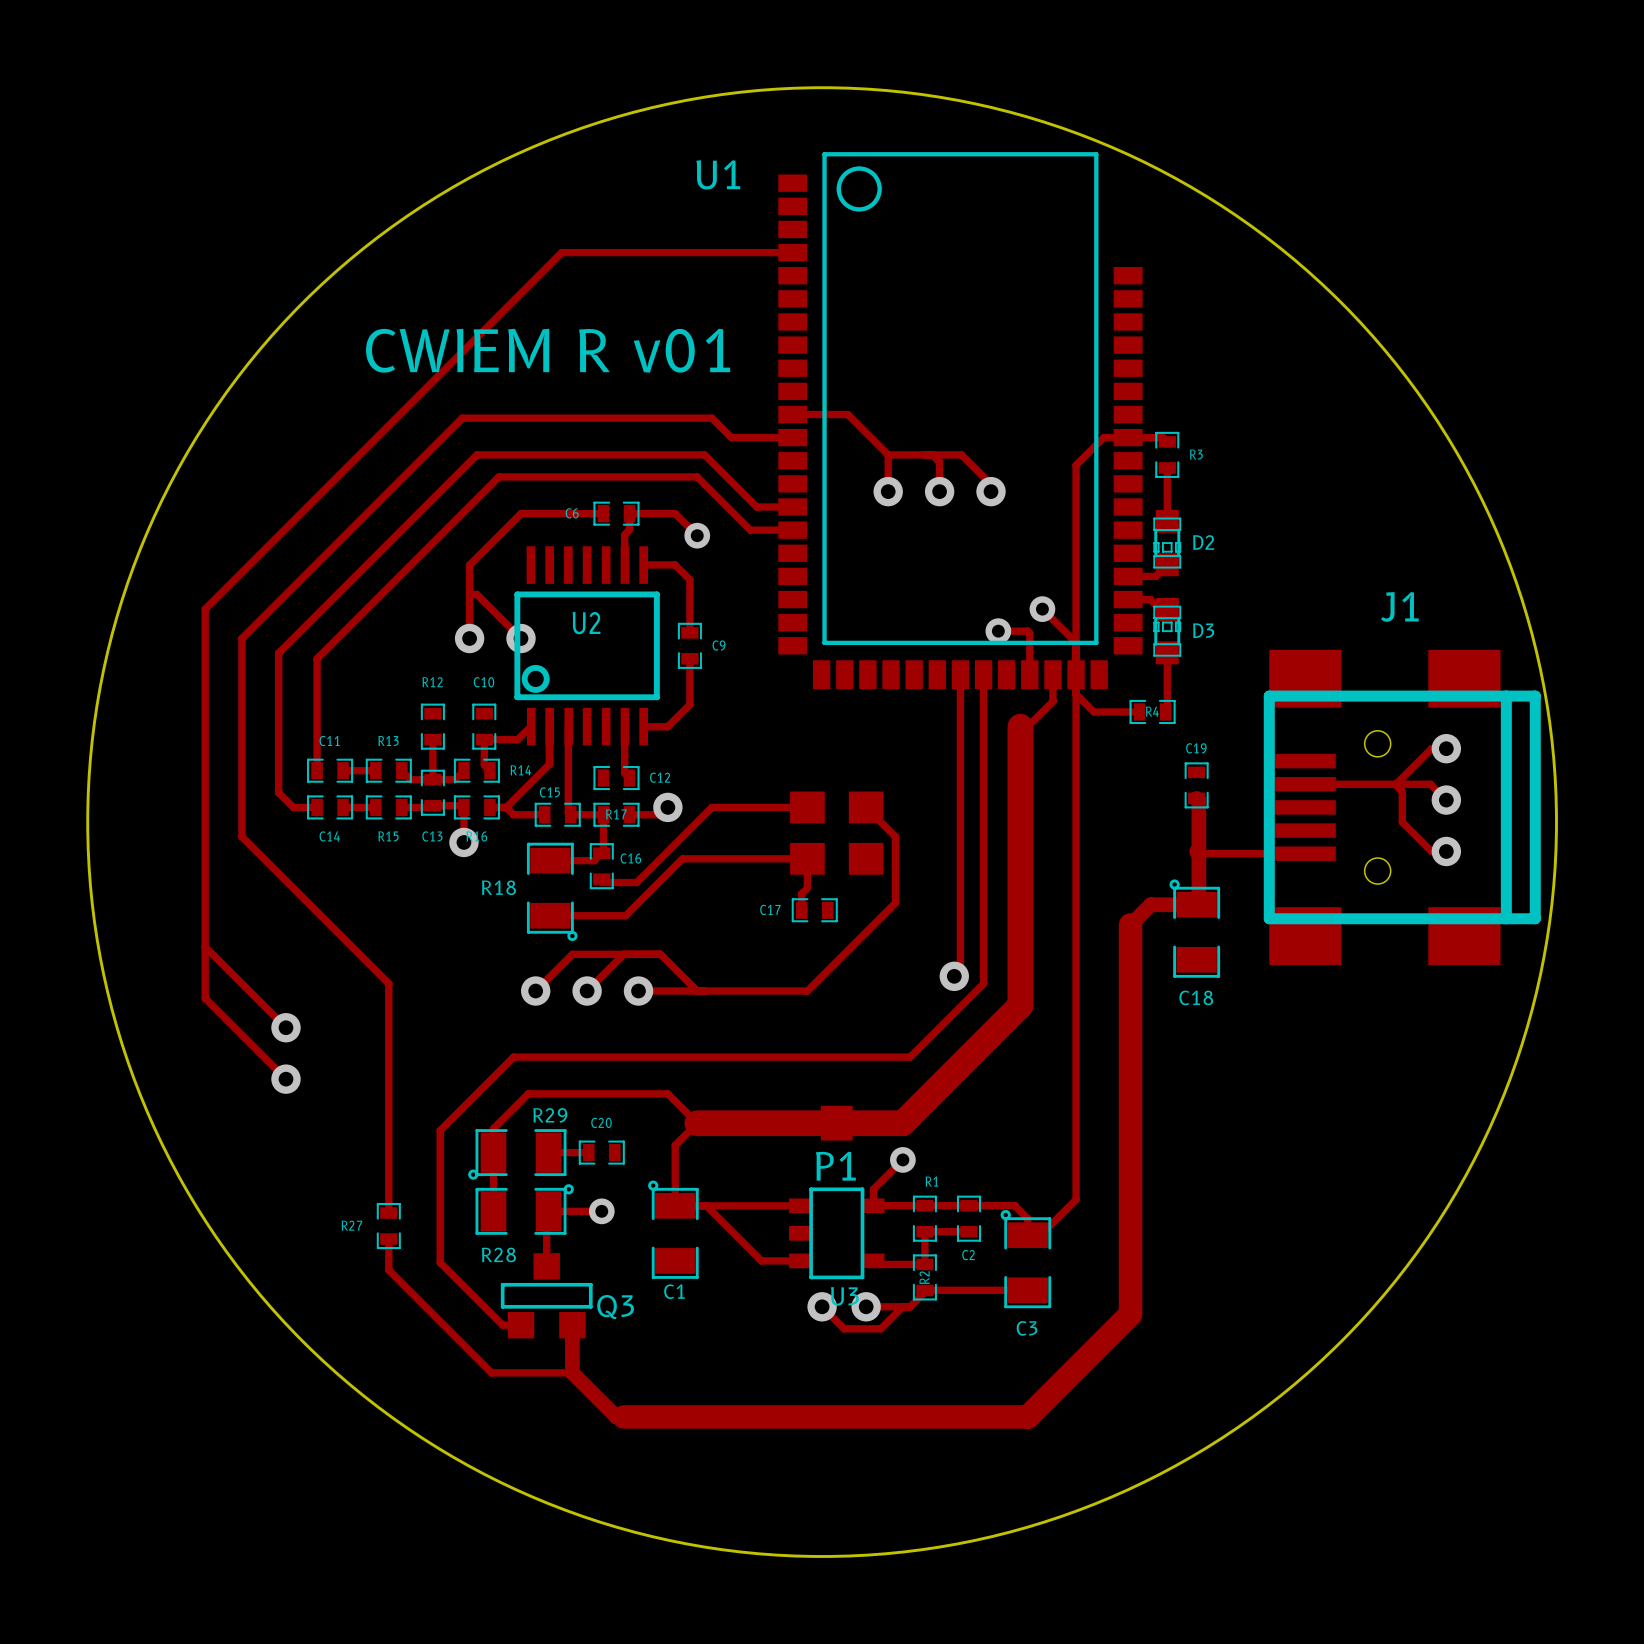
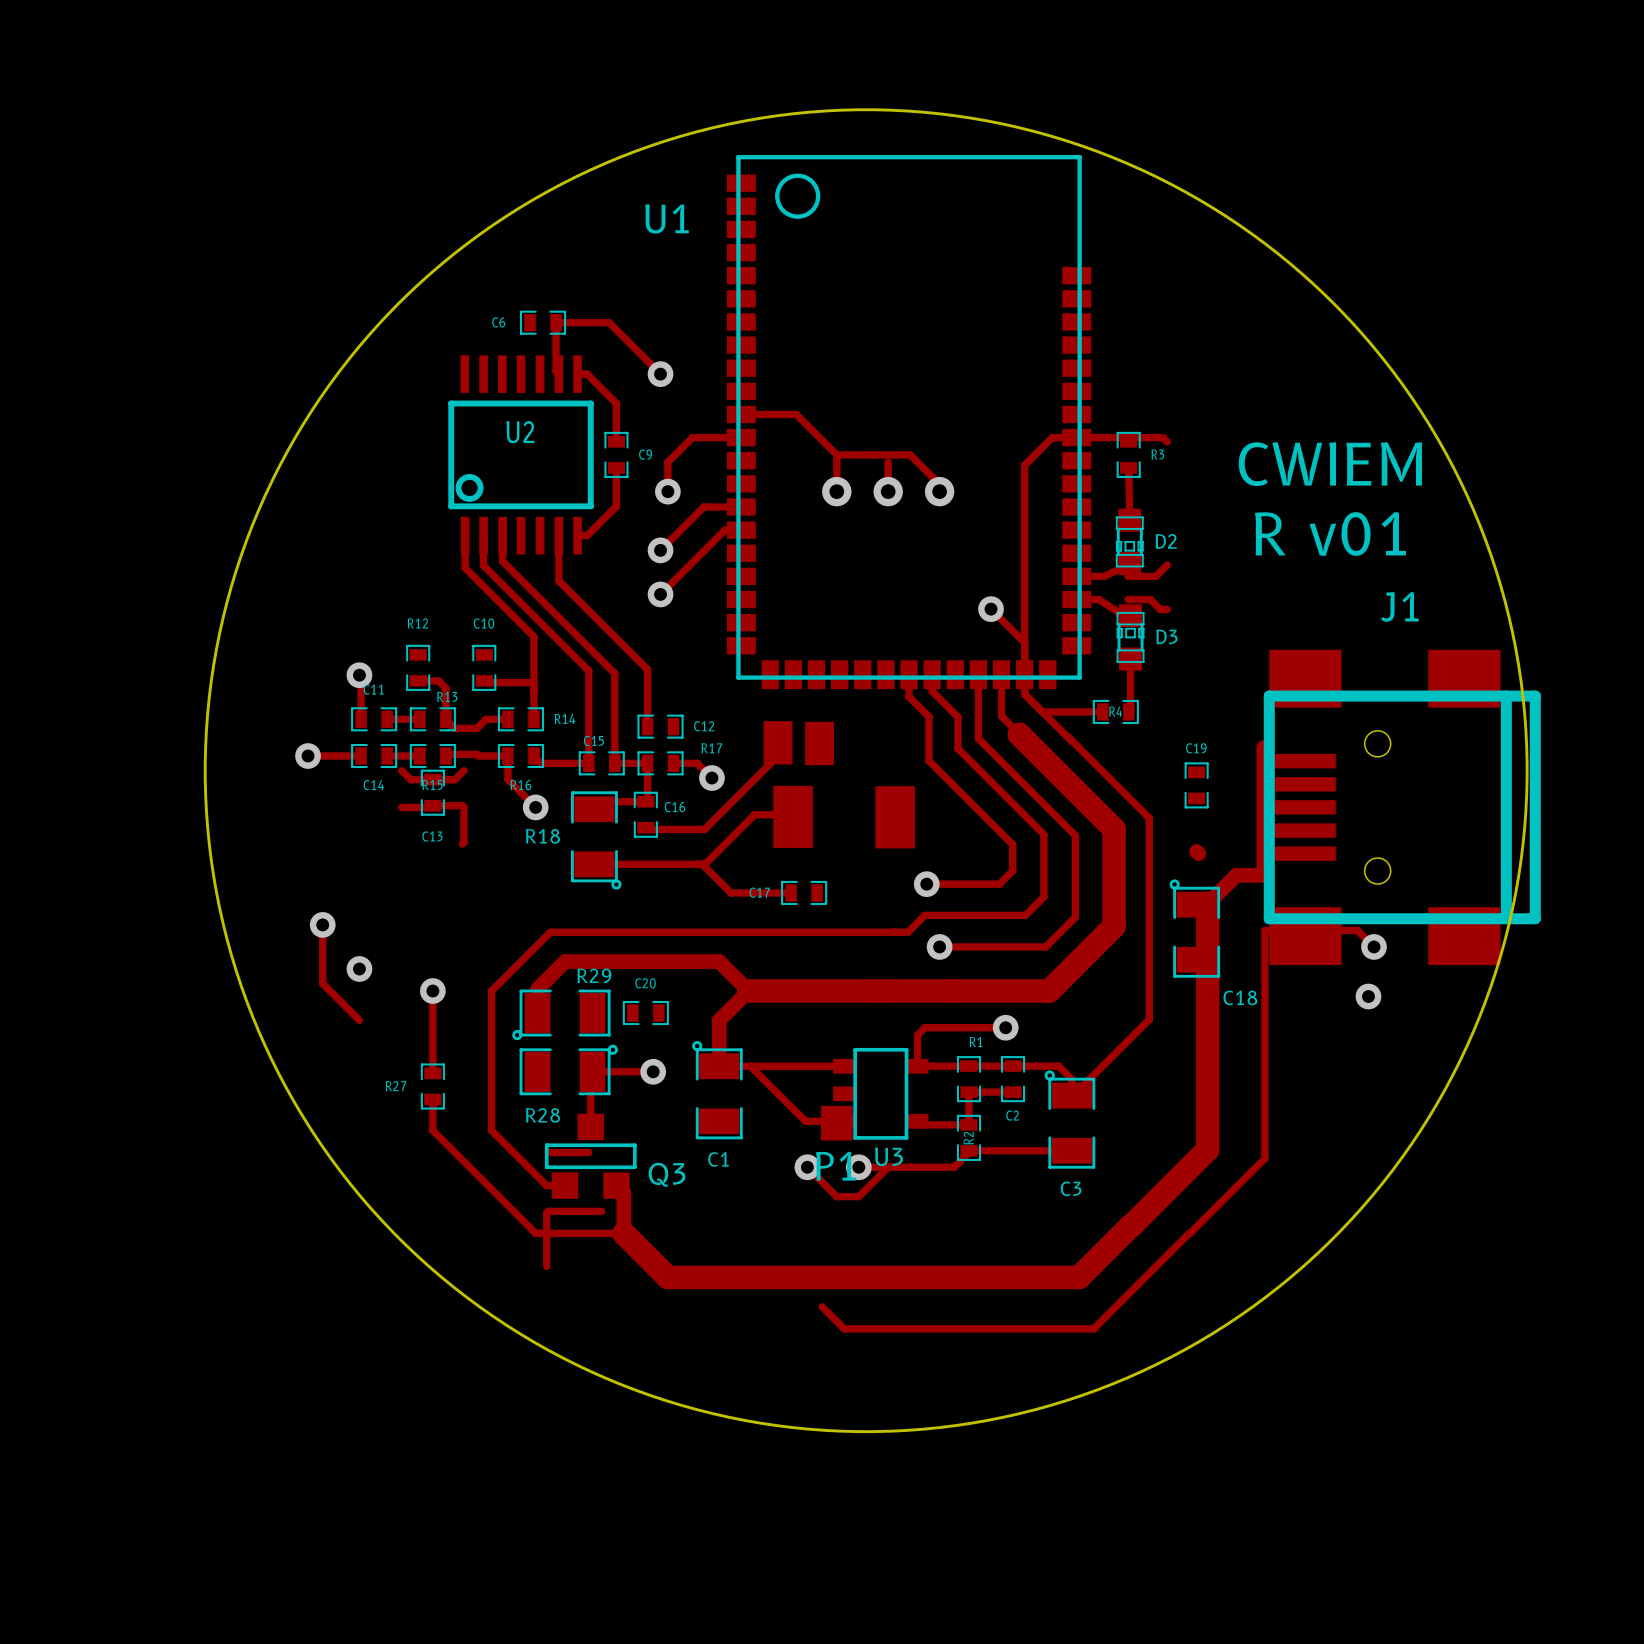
round board edge: [86, 86, 1558, 1558] -> none
round board edge: none -> [203, 108, 1529, 1434]
U1 footprint: [778, 152, 1143, 690] -> [726, 154, 1092, 690]
track: (792, 252) (561, 252) (205, 609) (205, 998) (286, 1079) -> none
text: CWIEM R v01 (548, 350) -> none
track: none -> (558, 374) (556, 371) (556, 322) (609, 322) (660, 374)
track: none -> (577, 374) (587, 374) (616, 403) (616, 441)
via: none -> (660, 374)
track: (796, 414) (847, 414) (888, 454) (888, 462) -> (796, 414) (836, 454)
track: (731, 437) (711, 418) (462, 418) (241, 638) (241, 836) (388, 983) (388, 1213) -> (731, 437) (692, 437) (667, 462) (667, 491)
track: (741, 437) (792, 437) -> (741, 414) (792, 414)
track: (1103, 437) (1076, 465) (1076, 1199) (1040, 1235) (1027, 1235) (1027, 1218) (1014, 1205) (873, 1205) -> (1103, 437) (1052, 437) (1024, 465) (1024, 694) (1071, 741)
track: none -> (836, 454) (888, 454)
track: none -> (836, 454) (836, 491)
track: (910, 454) (961, 454) (991, 484) (991, 491) -> none
track: (932, 454) (939, 462) (939, 484) -> (910, 454) (939, 484)
R3 position: (1167, 454) -> (1128, 454)
text: none -> CWIEM (1330, 464)
track: none -> (616, 467) (616, 506) (587, 535) (577, 535)
track: none -> (1128, 467) (1129, 520)
track: (1167, 467) (1167, 521) -> none
via: none -> (667, 491)
via position: (991, 491) -> (836, 491)
track: none -> (741, 507) (703, 507) (660, 550)
track: (792, 507) (756, 507) (704, 454) (476, 454) (278, 653) (278, 792) (293, 807) (317, 807) -> none
track: (603, 513) (521, 513) (469, 565) (469, 638) -> none
C6 position: (616, 513) -> (543, 322)
track: none -> (741, 530) (724, 530) (660, 594)
track: (792, 530) (750, 530) (697, 476) (498, 476) (317, 658) (317, 770) -> none
text: none -> R v01 (1330, 534)
track: none -> (465, 535) (465, 568) (534, 636) (534, 719)
track: none -> (483, 535) (483, 565) (588, 670) (588, 763) (541, 763) (534, 756)
track: none -> (502, 535) (502, 561) (614, 673) (614, 763) (647, 763) (647, 800) (645, 801) (601, 801) (594, 809)
track: none -> (558, 535) (558, 580) (647, 669) (647, 726)
track: (697, 535) (675, 513) (629, 513) (629, 530) (624, 534) (624, 564) -> none
via: (697, 535) -> none
D2 position: (1167, 543) -> (1129, 541)
via: none -> (660, 550)
track: none -> (1129, 563) (1104, 576) (1076, 576)
track: (643, 564) (675, 564) (689, 579) (689, 632) -> none
track: (469, 594) (476, 594) (521, 638) -> none
via: none -> (660, 594)
track: none -> (1076, 599) (1098, 599) (1123, 615) (1130, 615)
track: (1042, 609) (1076, 642) -> (991, 609) (1024, 642)
via: (1042, 609) -> none
track: (998, 631) (1027, 631) (1029, 633) (1029, 674) -> none
via position: (998, 631) -> (991, 609)
D3 position: (1167, 631) -> (1130, 637)
via: (469, 638) -> none
via: (521, 638) -> none
U2 position: (587, 645) -> (521, 454)
C9 position: (689, 645) -> (616, 454)
track: (1167, 652) (1167, 710) (1165, 711) -> none
track: (689, 658) (689, 704) (667, 726) (643, 726) -> none
track: none -> (1130, 659) (1130, 710) (1128, 711)
track: none -> (909, 674) (909, 696) (928, 716) (928, 760) (1012, 844) (1012, 870) (999, 884) (925, 882)
track: none -> (932, 674) (932, 691) (957, 717) (957, 748) (1043, 834) (1043, 897) (1025, 915) (924, 915) (908, 932) (550, 932) (491, 991) (491, 1130) (546, 1185) (565, 1185)
track: (960, 674) (960, 970) (954, 976) -> none
track: none -> (978, 674) (978, 738) (1075, 835) (1075, 917) (1045, 946) (939, 946)
track: (983, 674) (983, 983) (910, 1057) (513, 1057) (440, 1130) (440, 1262) (502, 1325) (521, 1325) -> none
track: (1052, 674) (1052, 701) (1027, 726) (1020, 726) (1020, 1005) (902, 1123) (697, 1123) -> none
track: none -> (359, 675) (361, 676) (361, 719)
via: none -> (359, 675)
track: none -> (998, 677) (1001, 674) (1001, 716) (1019, 734)
track: none -> (418, 680) (438, 680) (445, 688) (445, 719) (454, 728) (476, 728) (485, 719) (508, 719)
track: none -> (484, 680) (485, 682) (534, 682)
track: (1076, 694) (1093, 711) -> (1042, 711) (1093, 711)
track: (1102, 711) (1139, 711) -> none
R4 position: (1152, 711) -> (1115, 711)
R12 position: (432, 726) -> (418, 667)
C10 position: (484, 726) -> (484, 667)
track: (530, 726) (517, 739) (484, 739) (484, 765) (489, 770) -> none
track: (549, 726) (549, 764) (506, 807) -> none
track: (568, 726) (568, 812) (570, 814) (603, 814) (603, 851) (594, 860) (550, 860) -> none
track: (624, 726) (624, 773) (629, 778) -> none
track: none -> (1067, 737) (1149, 818) (1149, 1019) (1073, 1095) (1071, 1079) (1058, 1066) (917, 1066)
track: (432, 739) (432, 779) -> none
R13 name position: R13 (388, 740) -> R13 (447, 696)
part: none -> (778, 742)
part: none -> (819, 743)
track: none -> (1263, 747) (1264, 875) (1236, 875) (1207, 903) (1207, 1149) (1079, 1277) (667, 1277) (623, 1233)
track: (1446, 748) (1431, 748) (1396, 784) -> none
via: (1446, 748) -> none
track: none -> (308, 756) (361, 756)
via: none -> (308, 756)
track: none -> (445, 756) (447, 754) (508, 756) (508, 779) (535, 807)
track: none -> (778, 756) (704, 829) (647, 829) (645, 827)
track: none -> (673, 763) (697, 763) (711, 778)
C11 position: (330, 770) -> (374, 719)
track: (343, 770) (375, 770) -> (387, 719) (419, 719)
R13 position: (388, 770) -> (432, 719)
R14 position: (476, 770) -> (521, 719)
C12 position: (616, 778) -> (660, 726)
via: none -> (711, 778)
track: (1302, 784) (1430, 784) (1446, 800) -> none
track: (1394, 784) (1402, 791) (1402, 822) (1431, 851) (1446, 851) -> none
part footprint: [790, 791, 825, 824] -> [773, 785, 813, 849]
track: (1196, 798) (1198, 800) (1198, 902) (1196, 904) (1150, 904) (1130, 924) (1130, 1314) (1027, 1416) (616, 1416) (572, 1372) -> none
via: (1446, 800) -> none
C14 position: (330, 807) -> (374, 756)
track: (343, 807) (375, 807) -> (387, 756) (419, 756)
R15 position: (388, 807) -> (432, 756)
R16 position: (476, 807) -> (521, 756)
track: (506, 807) (513, 814) (544, 814) -> none
via: none -> (535, 807)
track: (667, 807) (660, 814) (629, 814) -> none
via: (667, 807) -> none
track: (807, 807) (711, 807) (636, 882) (601, 882) (601, 879) -> none
track: (866, 807) (895, 836) (895, 902) (807, 991) -> (1019, 734) (1114, 829) (1114, 926) (1049, 991) (807, 991)
part: (866, 807) -> none
C15 position: (557, 814) -> (601, 763)
R17 position: (616, 814) -> (660, 763)
R17 name position: R17 (616, 814) -> R17 (711, 748)
track: none -> (793, 816) (790, 814) (754, 814) (704, 864)
part: none -> (895, 817)
via: (463, 842) -> none
track: (1198, 851) (1198, 853) (1302, 853) -> none
via: (1446, 851) -> none
part: (807, 858) -> none
part: (866, 858) -> none
track: none -> (594, 864) (705, 864)
track: none -> (703, 864) (731, 892) (791, 892) (789, 891)
C16 position: (601, 866) -> (645, 814)
via: none -> (926, 884)
R18 position: (552, 891) -> (596, 840)
track: (801, 910) (801, 893) (807, 888) (807, 858) (682, 858) (625, 915) (550, 915) -> none
C17 position: (814, 910) -> (804, 892)
track: none -> (322, 924) (322, 983) (359, 1020)
via: none -> (322, 924)
track: (205, 946) (286, 1027) -> none
via: none -> (939, 946)
track: none -> (1374, 946) (1357, 930) (1264, 930) (1264, 1158) (1189, 1233)
via: none -> (1374, 946)
track: (623, 954) (587, 991) -> none
track: (565, 961) (572, 954) (660, 954) (697, 991) -> (565, 961) (719, 961) (748, 991) (719, 1020) (719, 1066) (844, 1066)
track width: thin (565, 961) (537, 989) -> thick (565, 961) (537, 989)
via: none -> (359, 968)
via: (954, 976) -> none
track: none -> (432, 991) (432, 1073)
via: none -> (432, 991)
via: (535, 991) -> none
via: (587, 991) -> none
track: (638, 991) (748, 991) -> none
via: (638, 991) -> none
track width: thin (748, 991) (807, 991) -> thick (748, 991) (807, 991)
via: none -> (1368, 996)
C18 name position: C18 (1196, 997) -> C18 (1240, 997)
via: (286, 1027) -> none
track: none -> (1005, 1027) (924, 1027) (917, 1035) (917, 1066)
via: none -> (1005, 1027)
track: none -> (653, 1071) (592, 1071) (590, 1073) (590, 1126)
via: none -> (653, 1071)
via: (286, 1079) -> none
track: none -> (432, 1099) (432, 1130) (535, 1233) (623, 1233)
track: (697, 1123) (675, 1145) (675, 1205) (800, 1205) -> none
track: (697, 1123) (667, 1093) (528, 1093) (493, 1128) (493, 1211) -> none
track: none -> (968, 1150) (954, 1167) (858, 1167)
track: none -> (969, 1150) (1071, 1150)
C20 position: (601, 1152) -> (645, 1013)
R29 position: (517, 1154) -> (561, 1014)
track: (902, 1159) (873, 1189) (873, 1205) -> none
via position: (902, 1159) -> (858, 1167)
track: none -> (807, 1167) (836, 1196) (858, 1196) (888, 1167)
via: none -> (807, 1167)
track: none -> (616, 1185) (623, 1192) (623, 1233)
track: (706, 1205) (761, 1260) (800, 1260) -> (750, 1066) (805, 1121) (844, 1121)
R28 position: (524, 1209) -> (568, 1069)
via: (601, 1211) -> none
R1 position: (924, 1218) -> (968, 1079)
C2 position: (968, 1218) -> (1013, 1079)
R27 position: (388, 1226) -> (432, 1086)
C1 position: (673, 1229) -> (717, 1090)
track: (968, 1231) (924, 1231) (924, 1264) (877, 1264) (873, 1260) -> (1013, 1092) (968, 1092) (968, 1124) (921, 1124) (917, 1121)
U3 position: (836, 1233) -> (880, 1093)
track: (388, 1239) (388, 1270) (491, 1372) (572, 1372) -> none
C3 position: (1025, 1259) -> (1069, 1119)
R2 position: (924, 1277) -> (968, 1137)
track: (1027, 1290) (925, 1290) (910, 1306) (866, 1306) -> none
C1 name position: C1 (674, 1291) -> C1 (718, 1159)
Q3 position: (546, 1295) -> (590, 1156)
via: (822, 1306) -> none
via: (866, 1306) -> none
track: (902, 1306) (880, 1328) -> (1189, 1233) (1093, 1328) (880, 1328)
Q3 name position: Q3 (615, 1307) -> Q3 (667, 1174)
track: (572, 1325) (572, 1372) -> none

